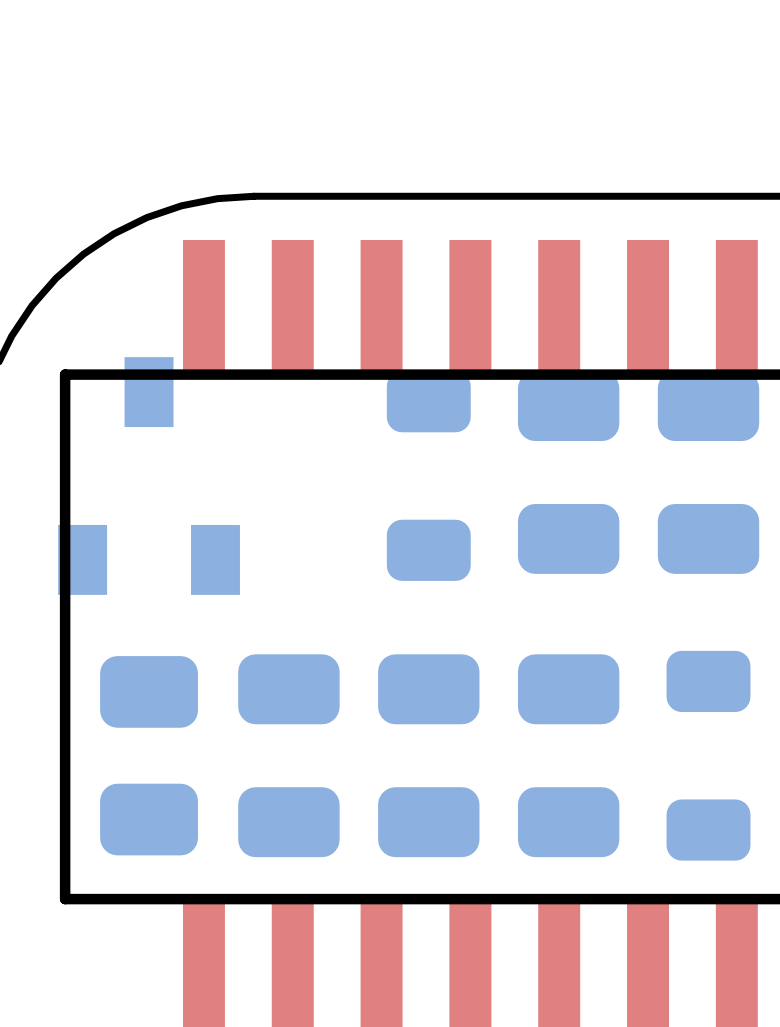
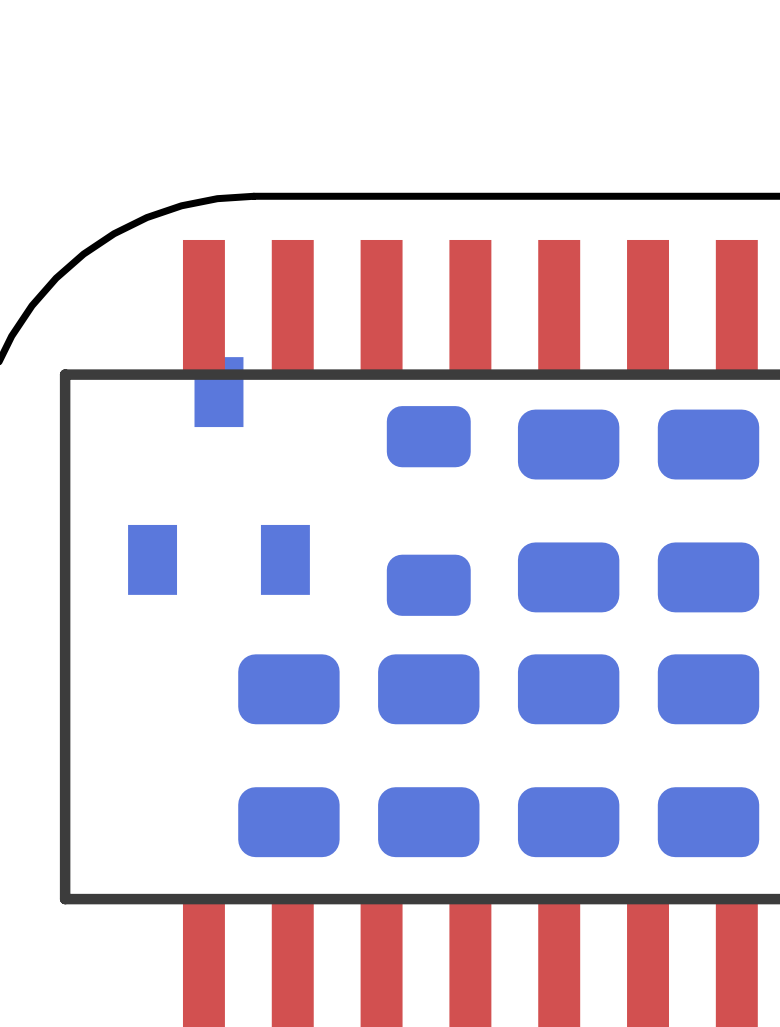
part position: (568, 472) -> (568, 510)
part position: (708, 472) -> (708, 510)
part position: (149, 476) -> (218, 476)
part position: (428, 476) -> (428, 510)
part footprint: [666, 650, 751, 861] -> [657, 654, 760, 858]
part: (149, 755) -> none

